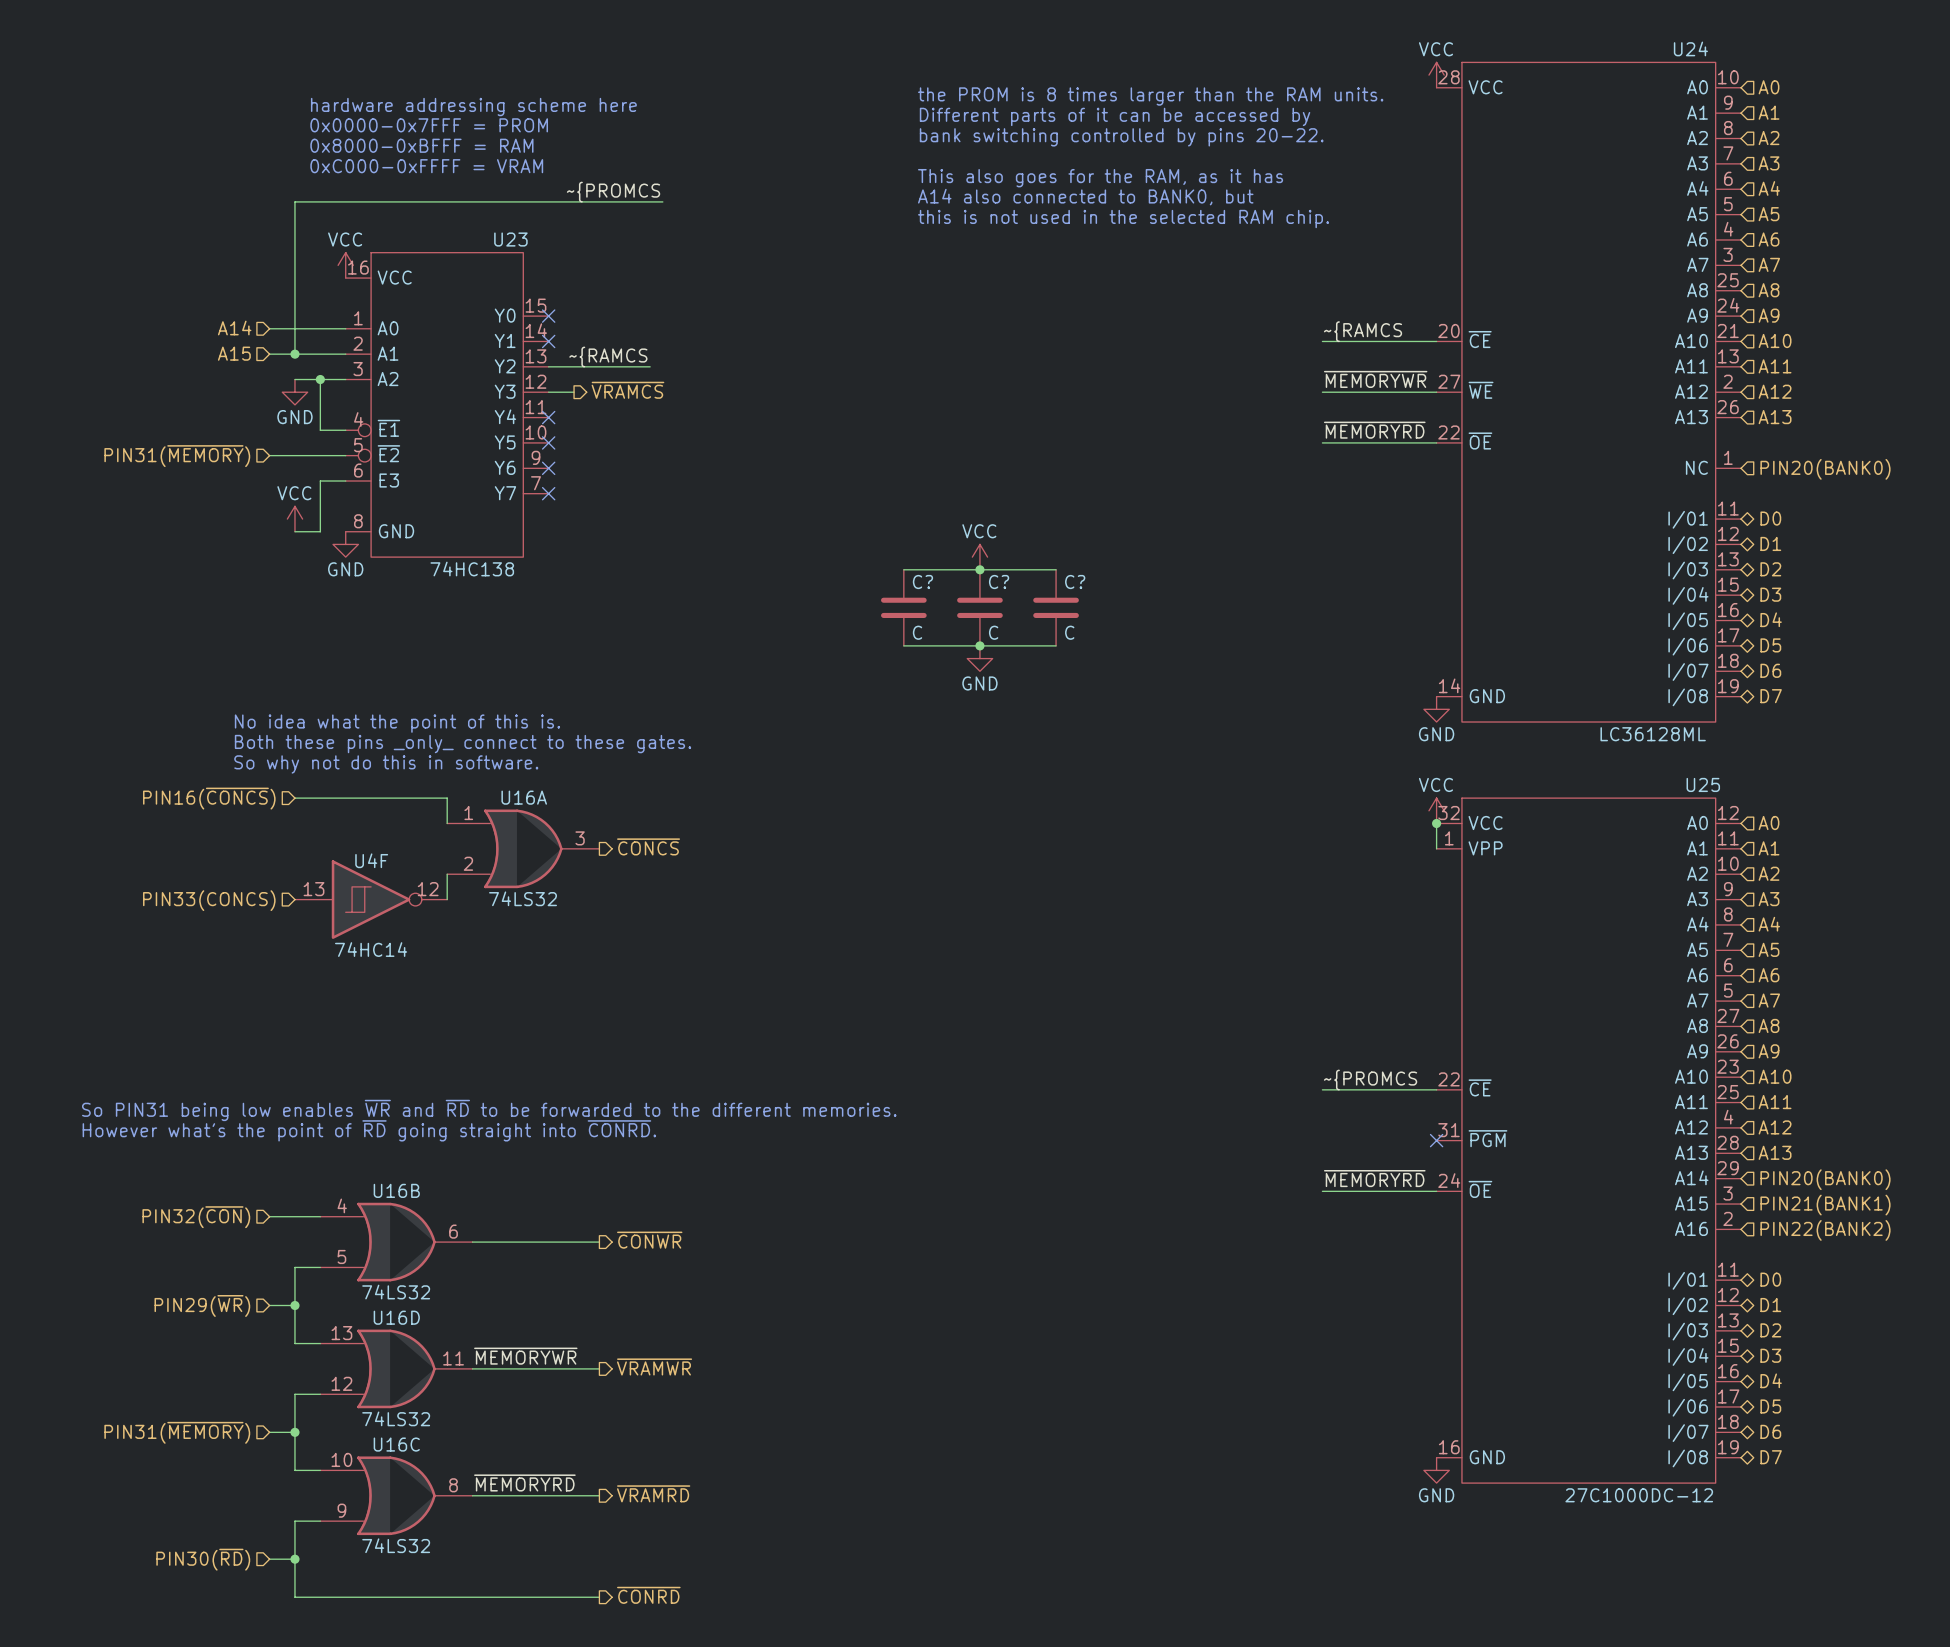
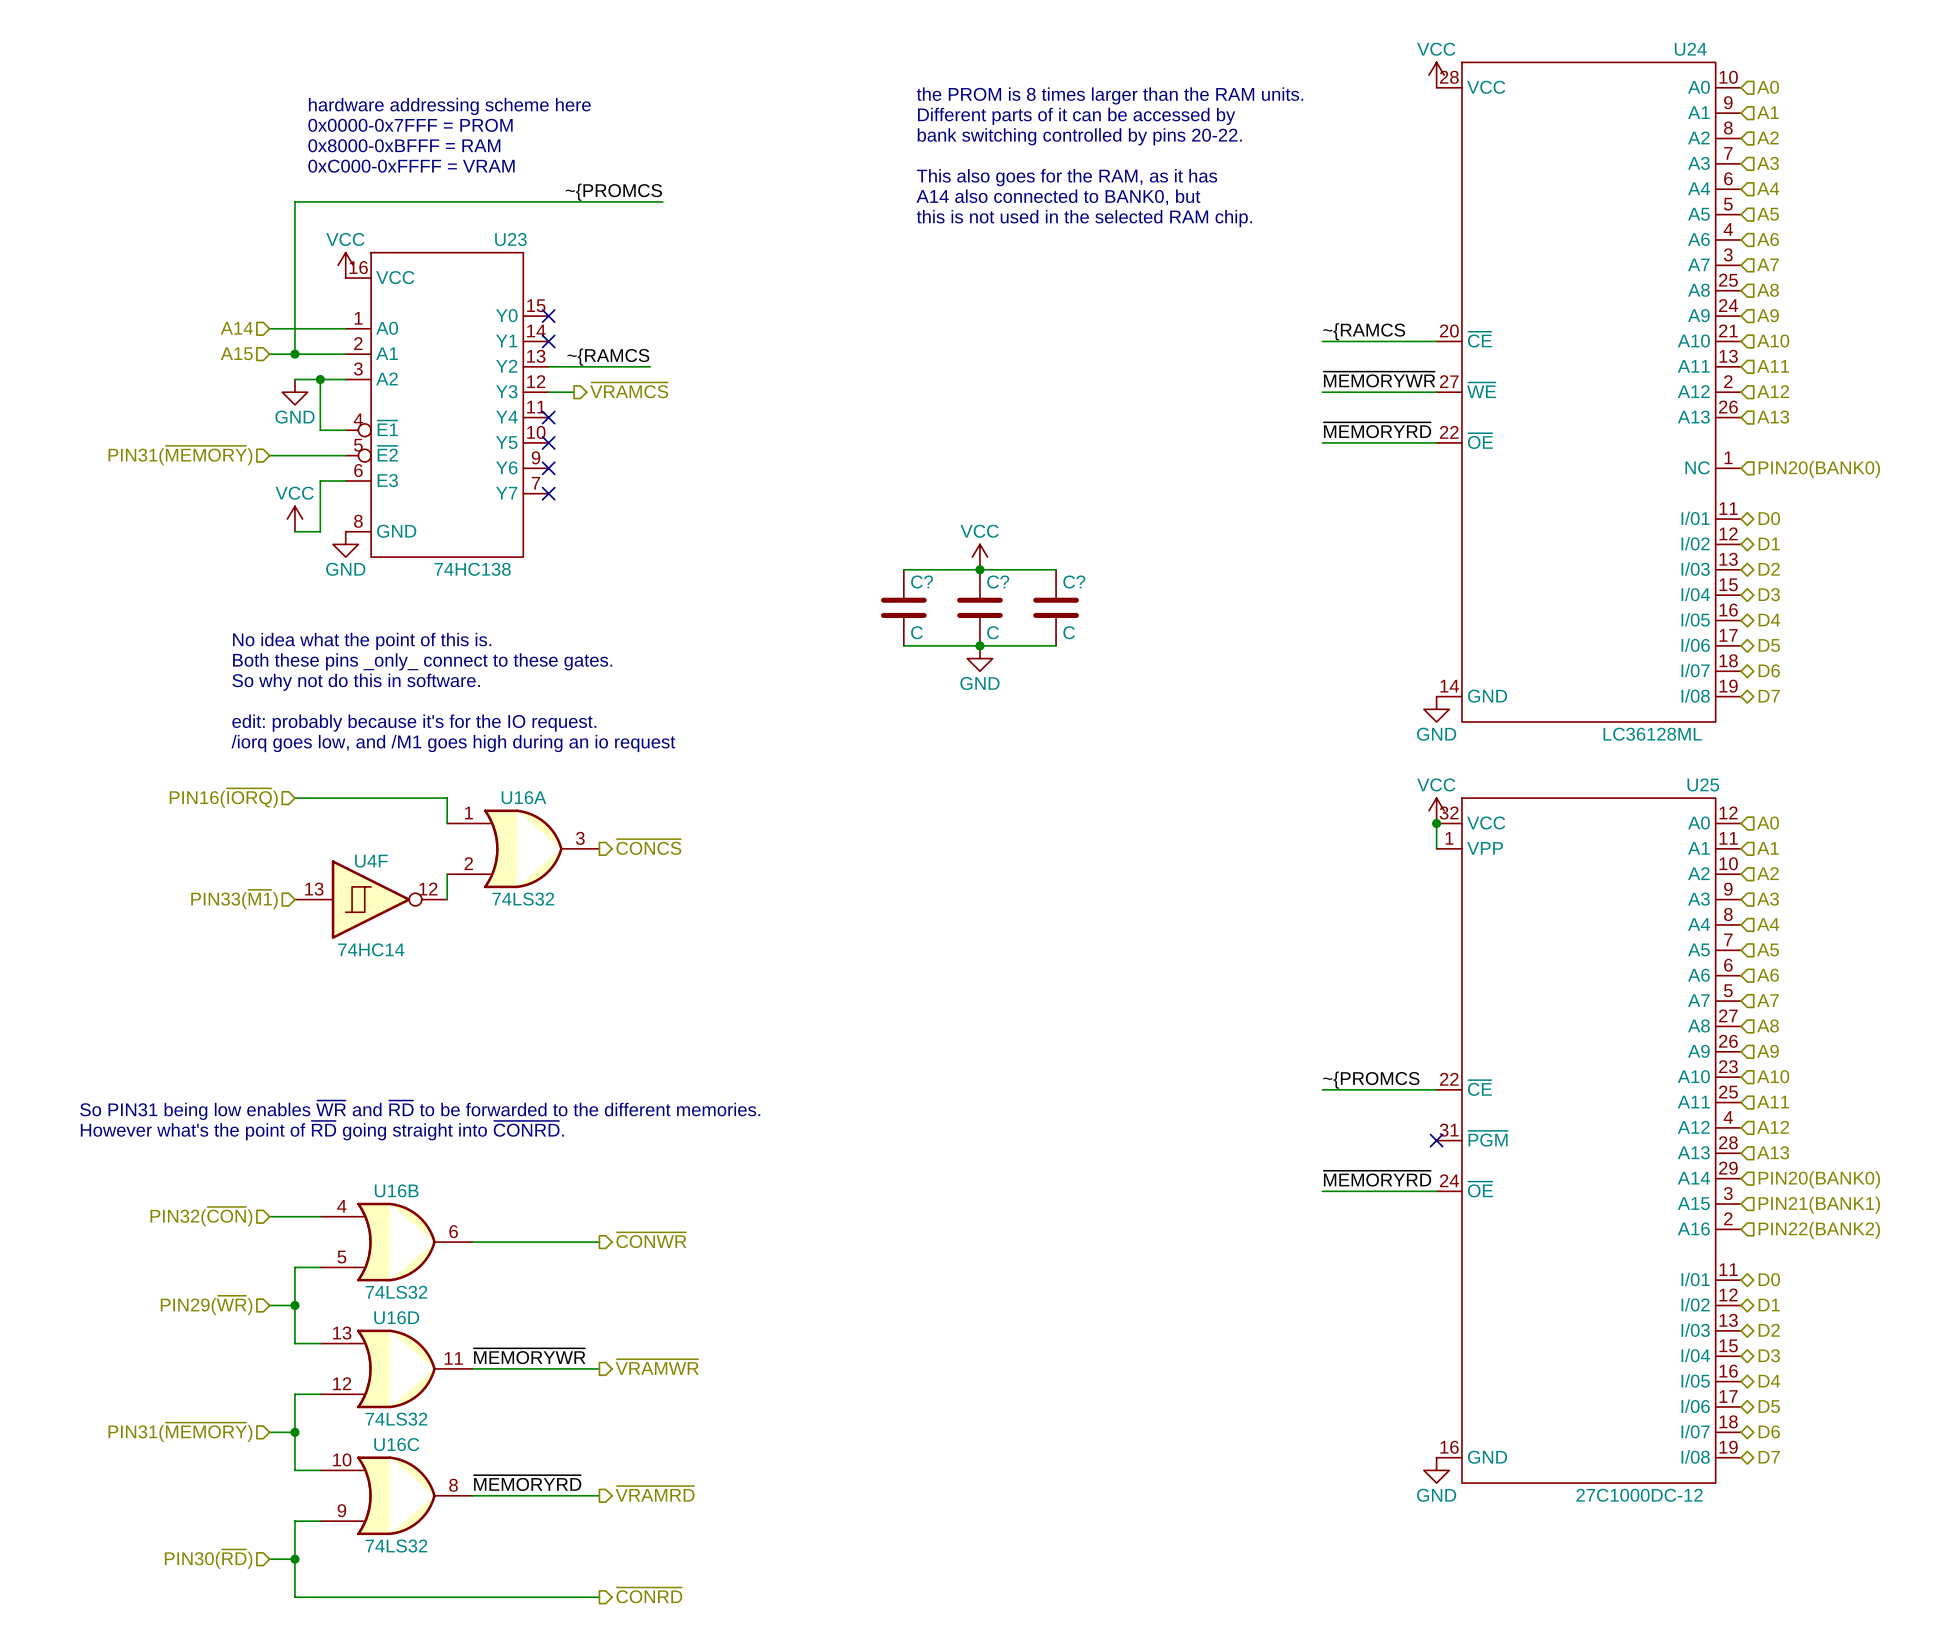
text: none -> No idea what the point of this is. (362, 641)
text: none -> Both these pins _only_ connect to these gates. (422, 661)
text: No idea what the point of this is. (397, 723) -> edit: probably because it's for the IO request. (414, 723)
text: Both these pins _only_ connect to these gates. (462, 744) -> /iorq goes low, and /M1 goes high during an io request (453, 743)
text position: So why not do this in software. (386, 764) -> So why not do this in software. (356, 682)
hierarchical label: PIN16(~{CONCS}) (209, 798) -> PIN16(~{IORQ}) (223, 798)
hierarchical label: PIN33(CONCS) (209, 900) -> PIN33(~{M1}) (234, 899)

